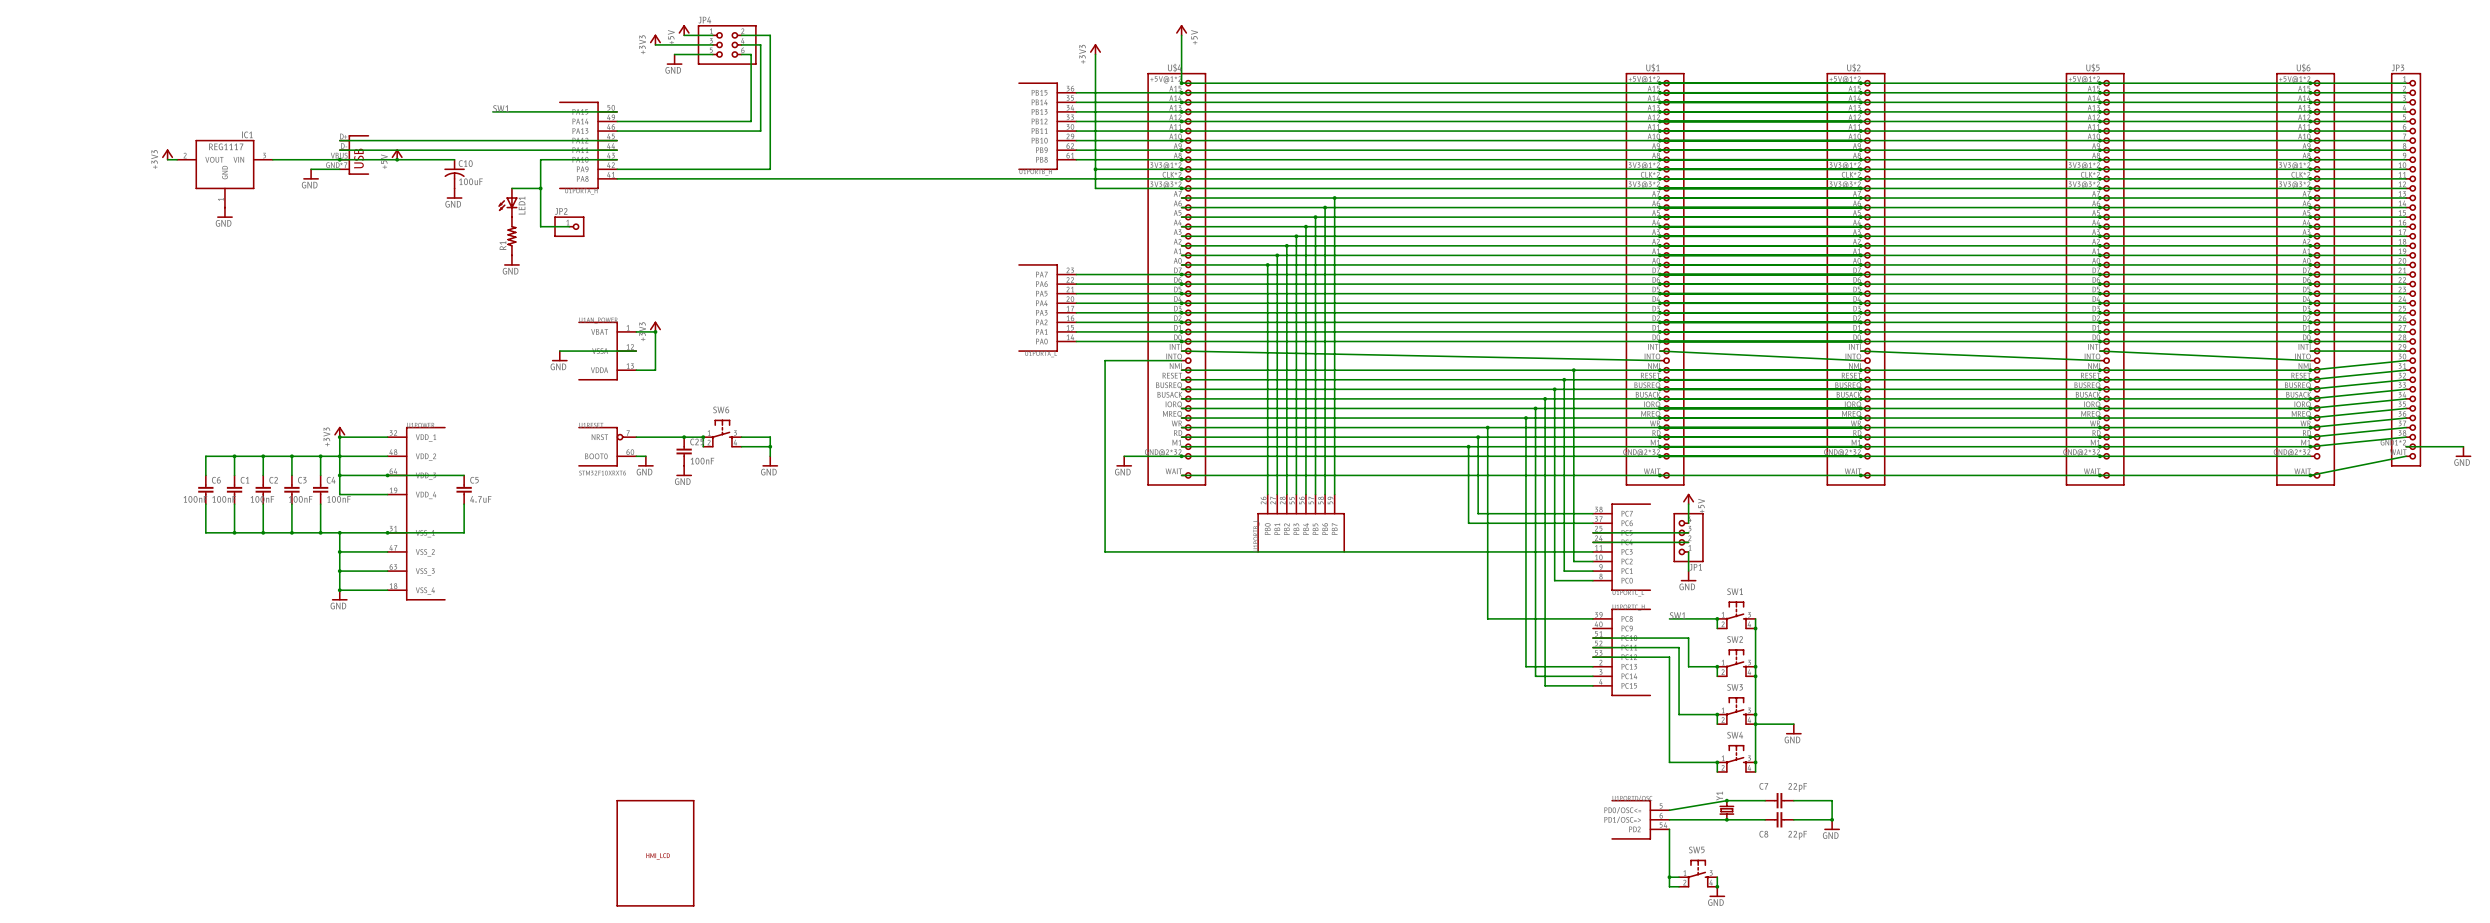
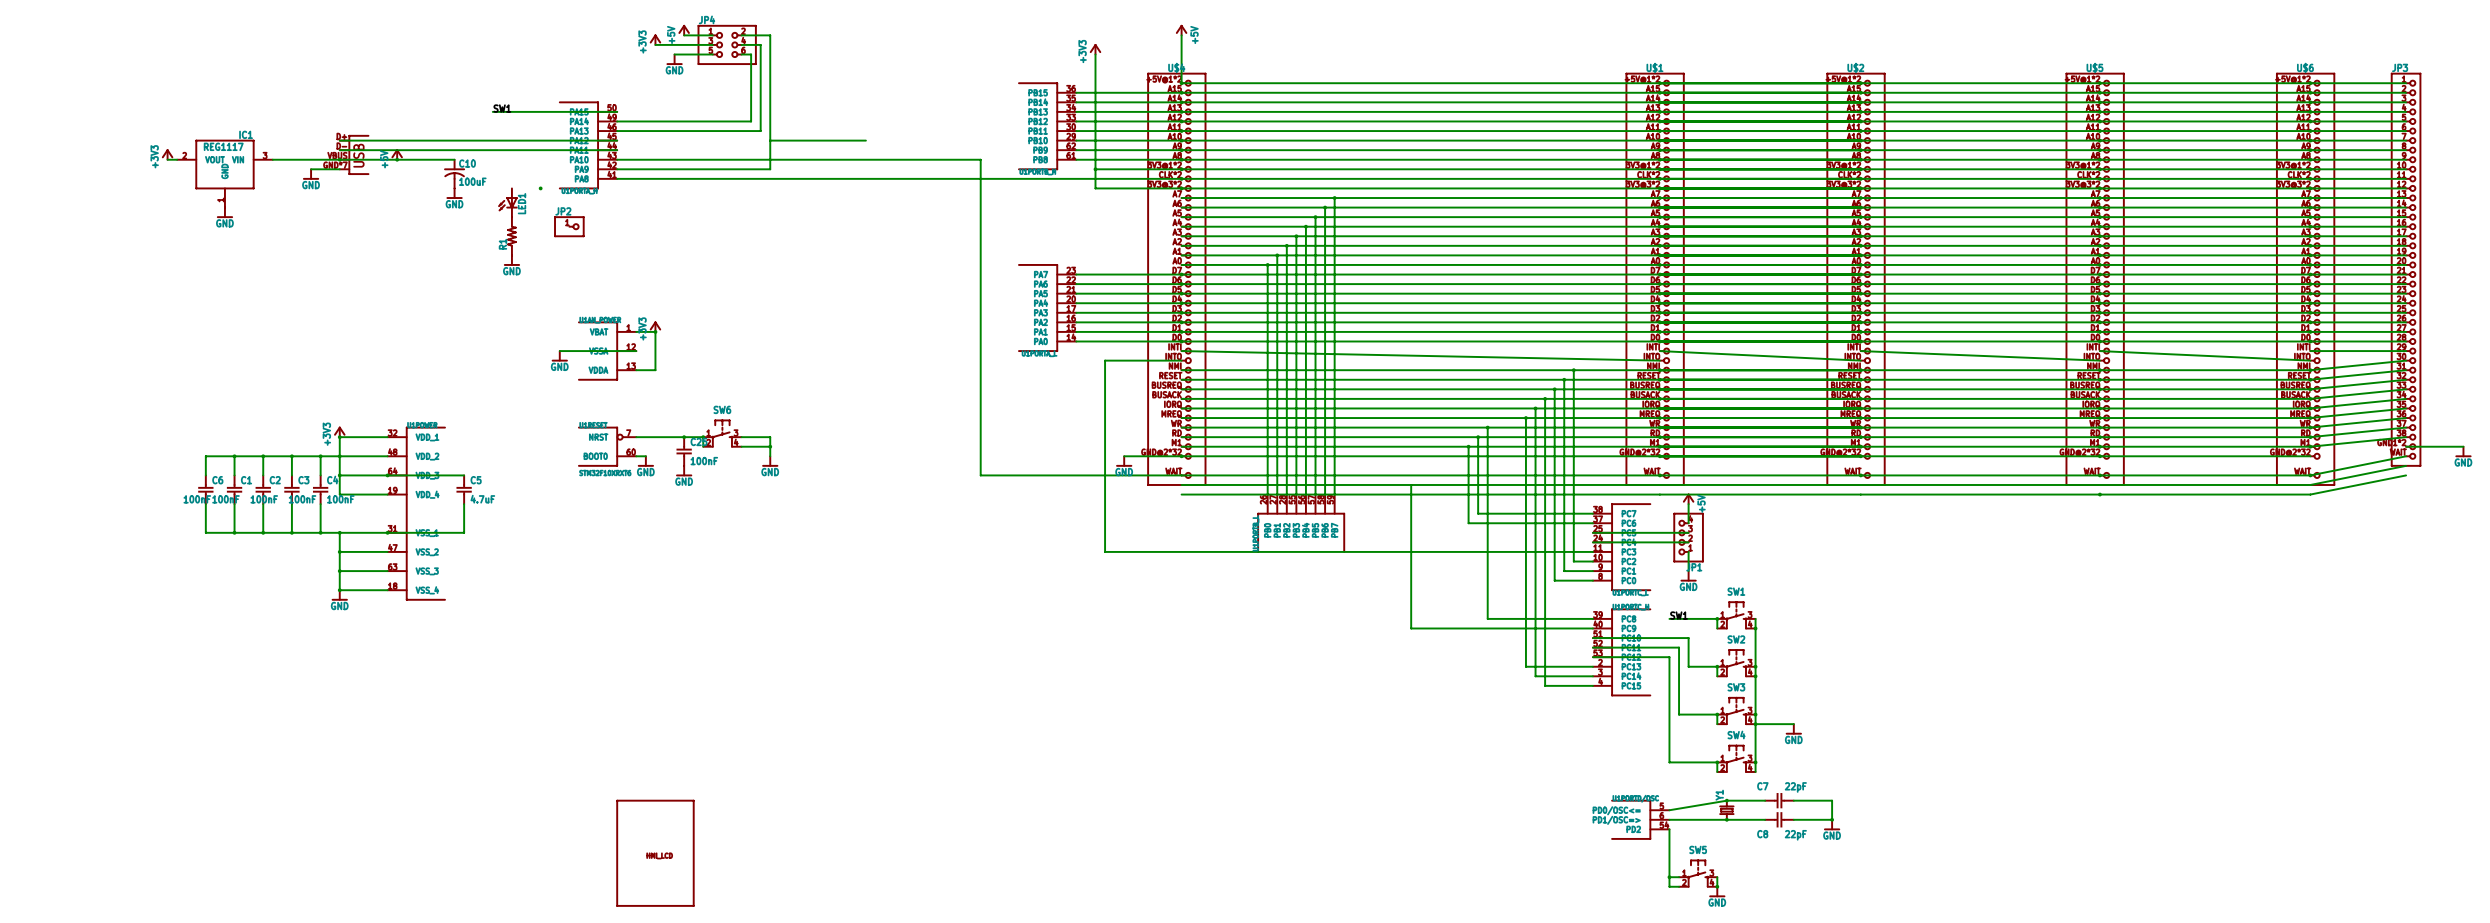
wire: none -> (770, 140) (865, 140)
wire: (617, 159) (540, 159) (540, 226) (569, 226) -> (617, 159) (980, 159) (980, 475) (1181, 475)
wire: (511, 188) (540, 188) -> none
wire: none -> (2406, 465) (2310, 484) (1181, 484)
wire: none -> (2406, 475) (2310, 494) (1181, 494)
wire: none -> (1411, 484) (1411, 628) (1592, 628)
junction: none -> (2099, 494)

